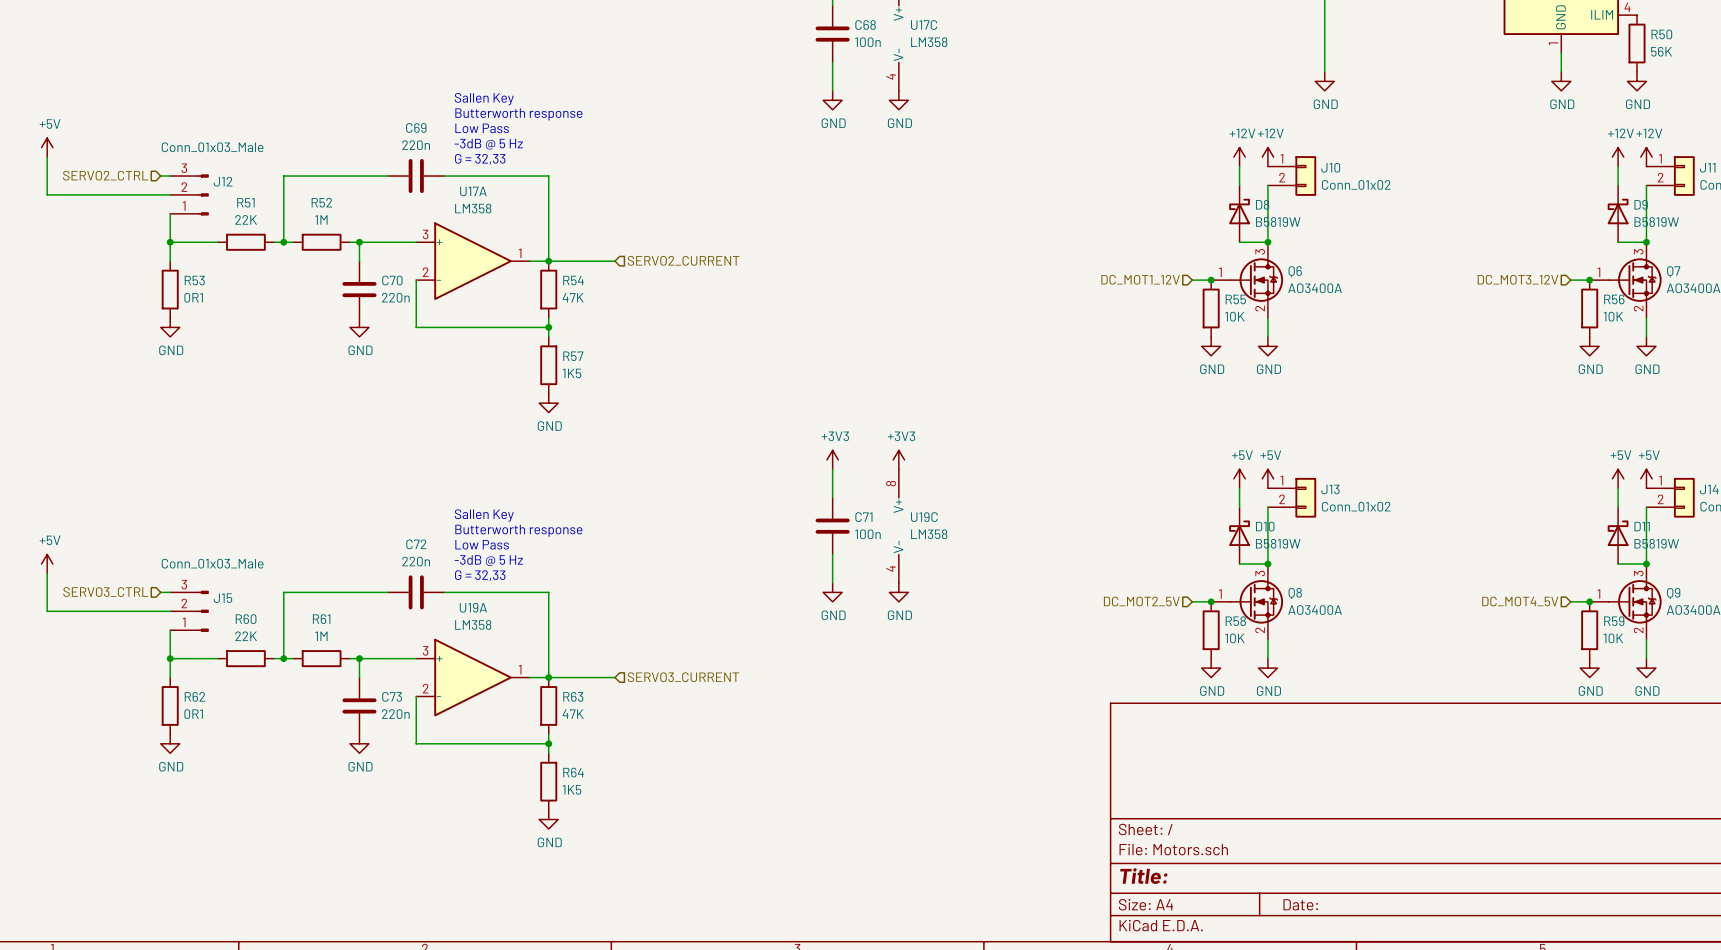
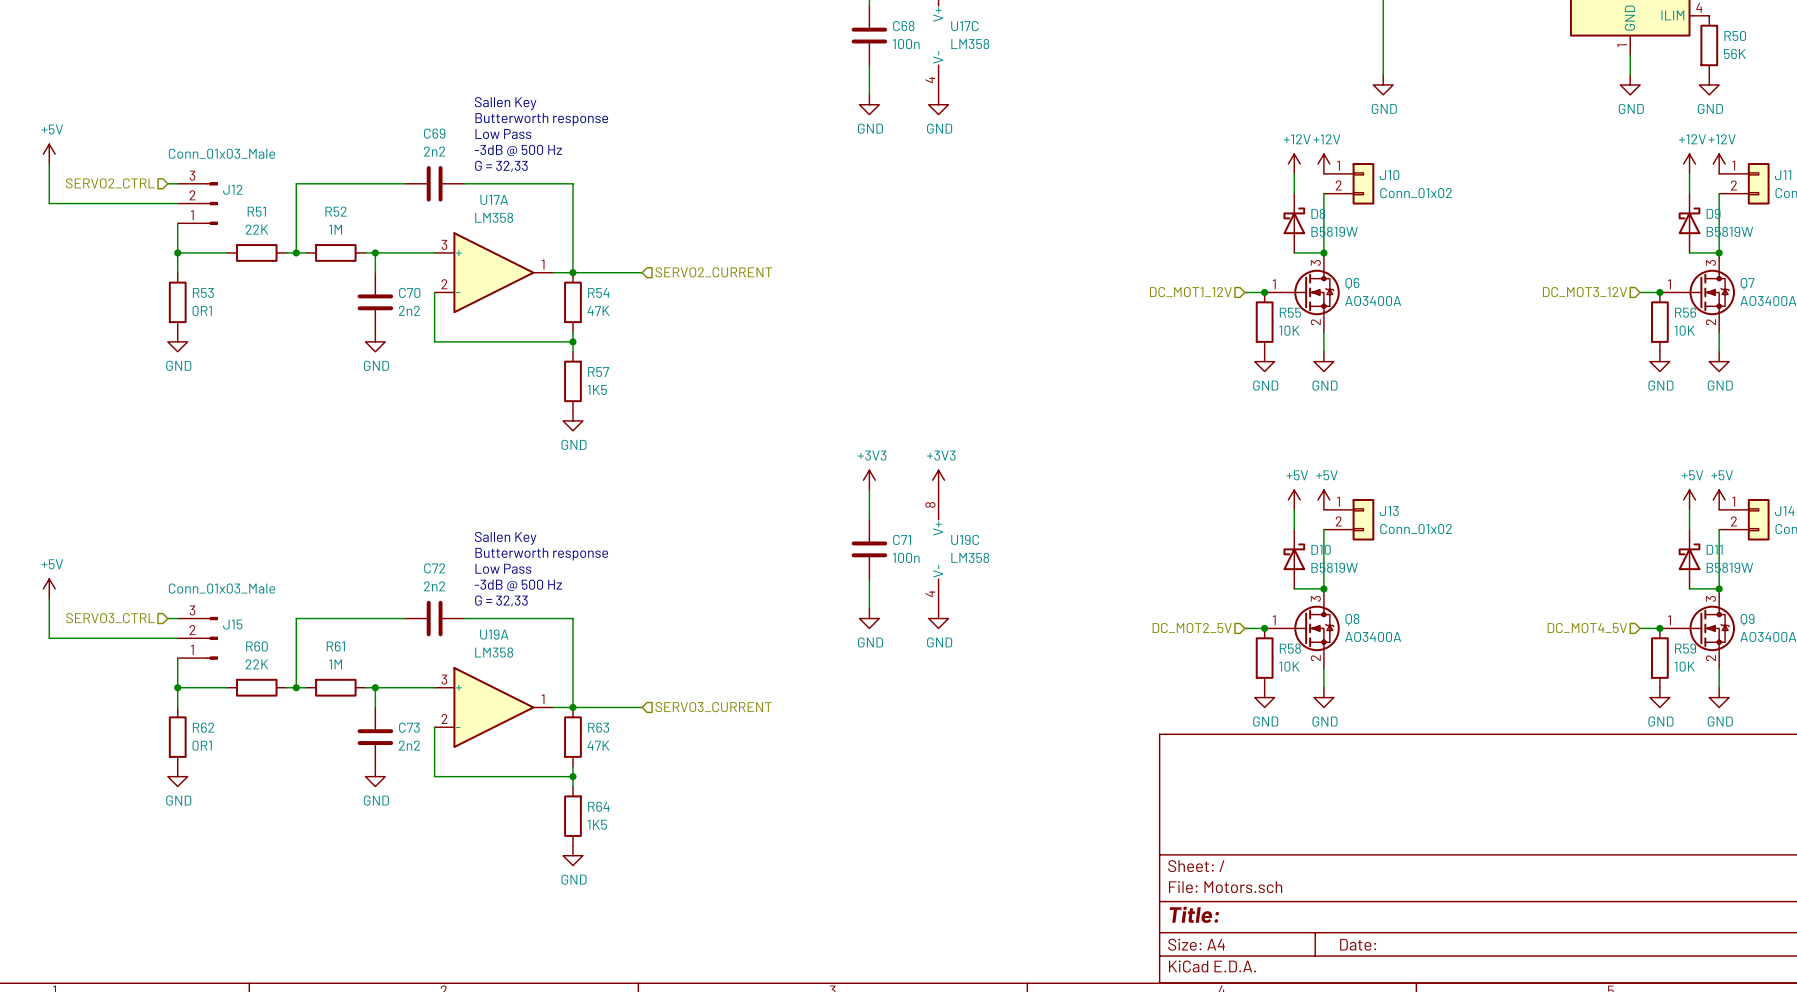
text: -3dB @ 5 Hz (488, 144) -> -3dB @ 500 Hz (518, 150)
C69 value: 220n (416, 145) -> 2n2 (434, 151)
C70 value: 220n (395, 297) -> 2n2 (409, 310)
text: -3dB @ 5 Hz (488, 560) -> -3dB @ 500 Hz (518, 585)
C72 value: 220n (416, 561) -> 2n2 (434, 586)
C73 value: 220n (395, 714) -> 2n2 (409, 745)

